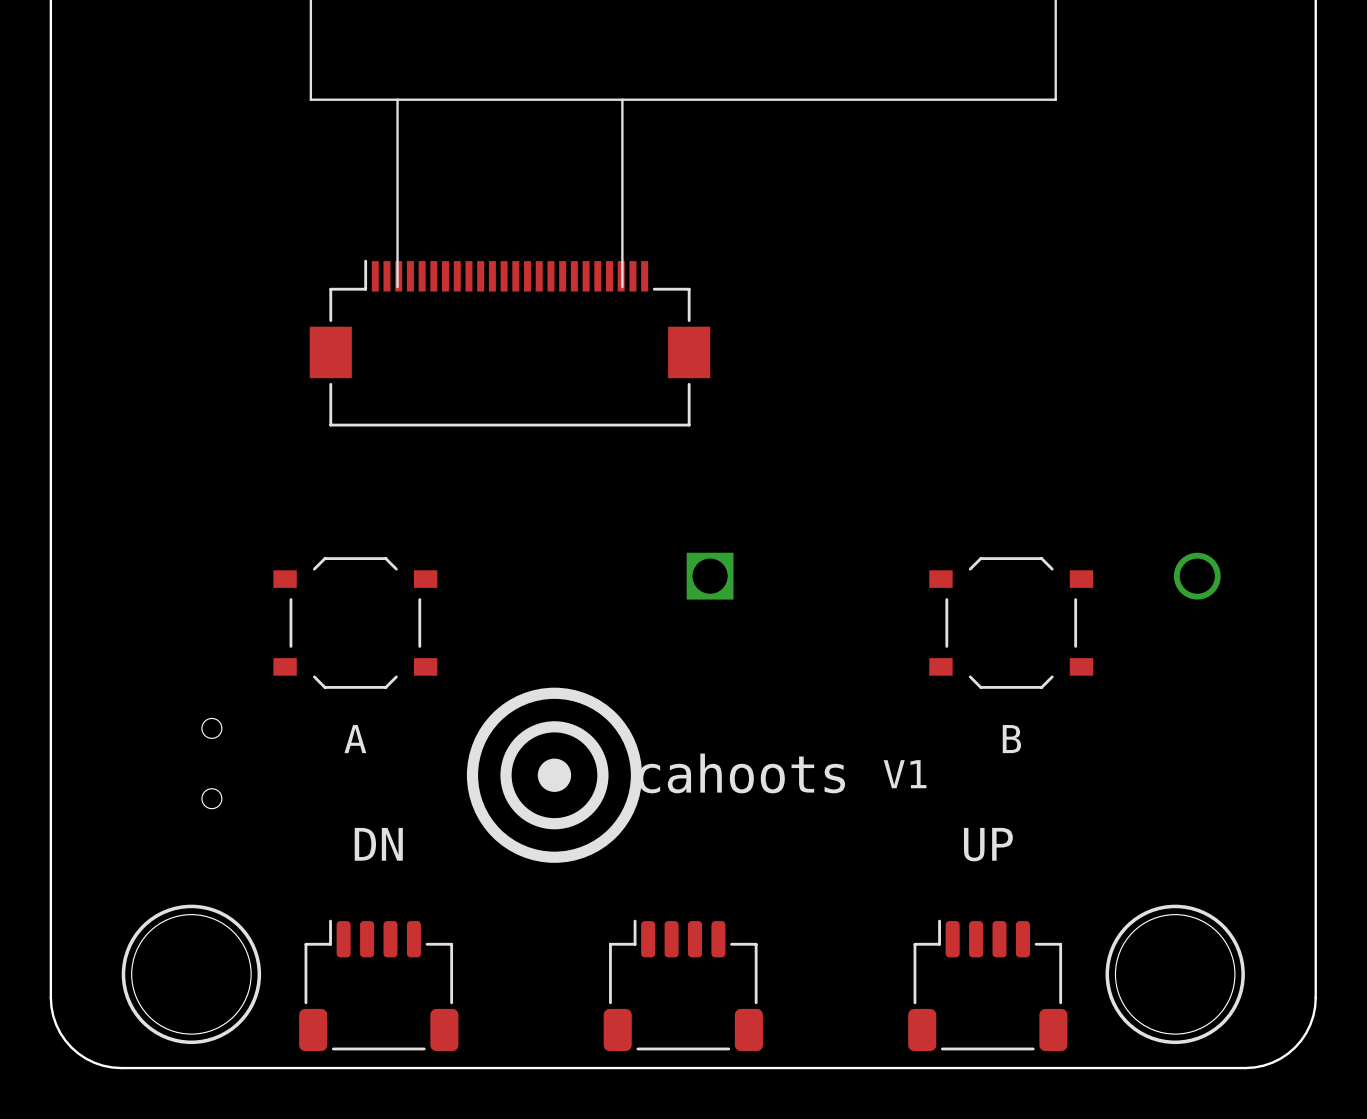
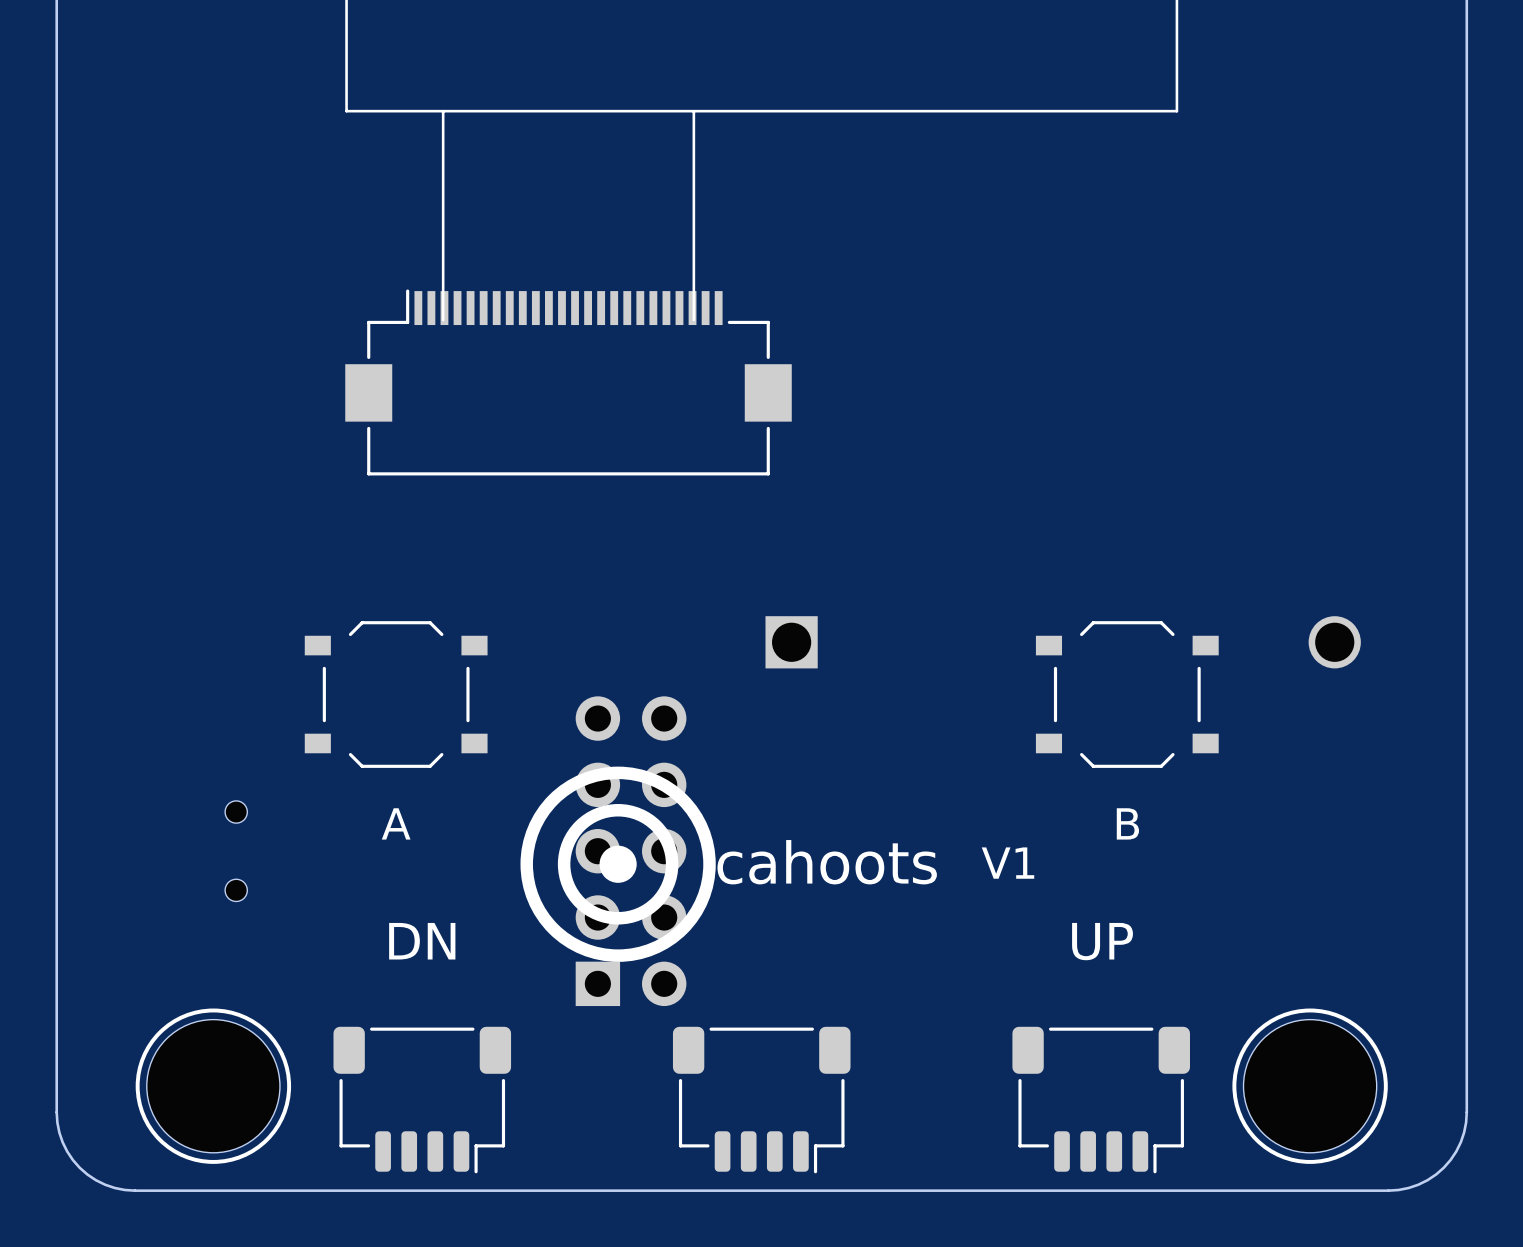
part: none -> (631, 851)
part rotation: 0° (378, 985) -> 180° (422, 1100)
part rotation: 0° (683, 985) -> 180° (761, 1100)
part rotation: 0° (987, 985) -> 180° (1101, 1100)

